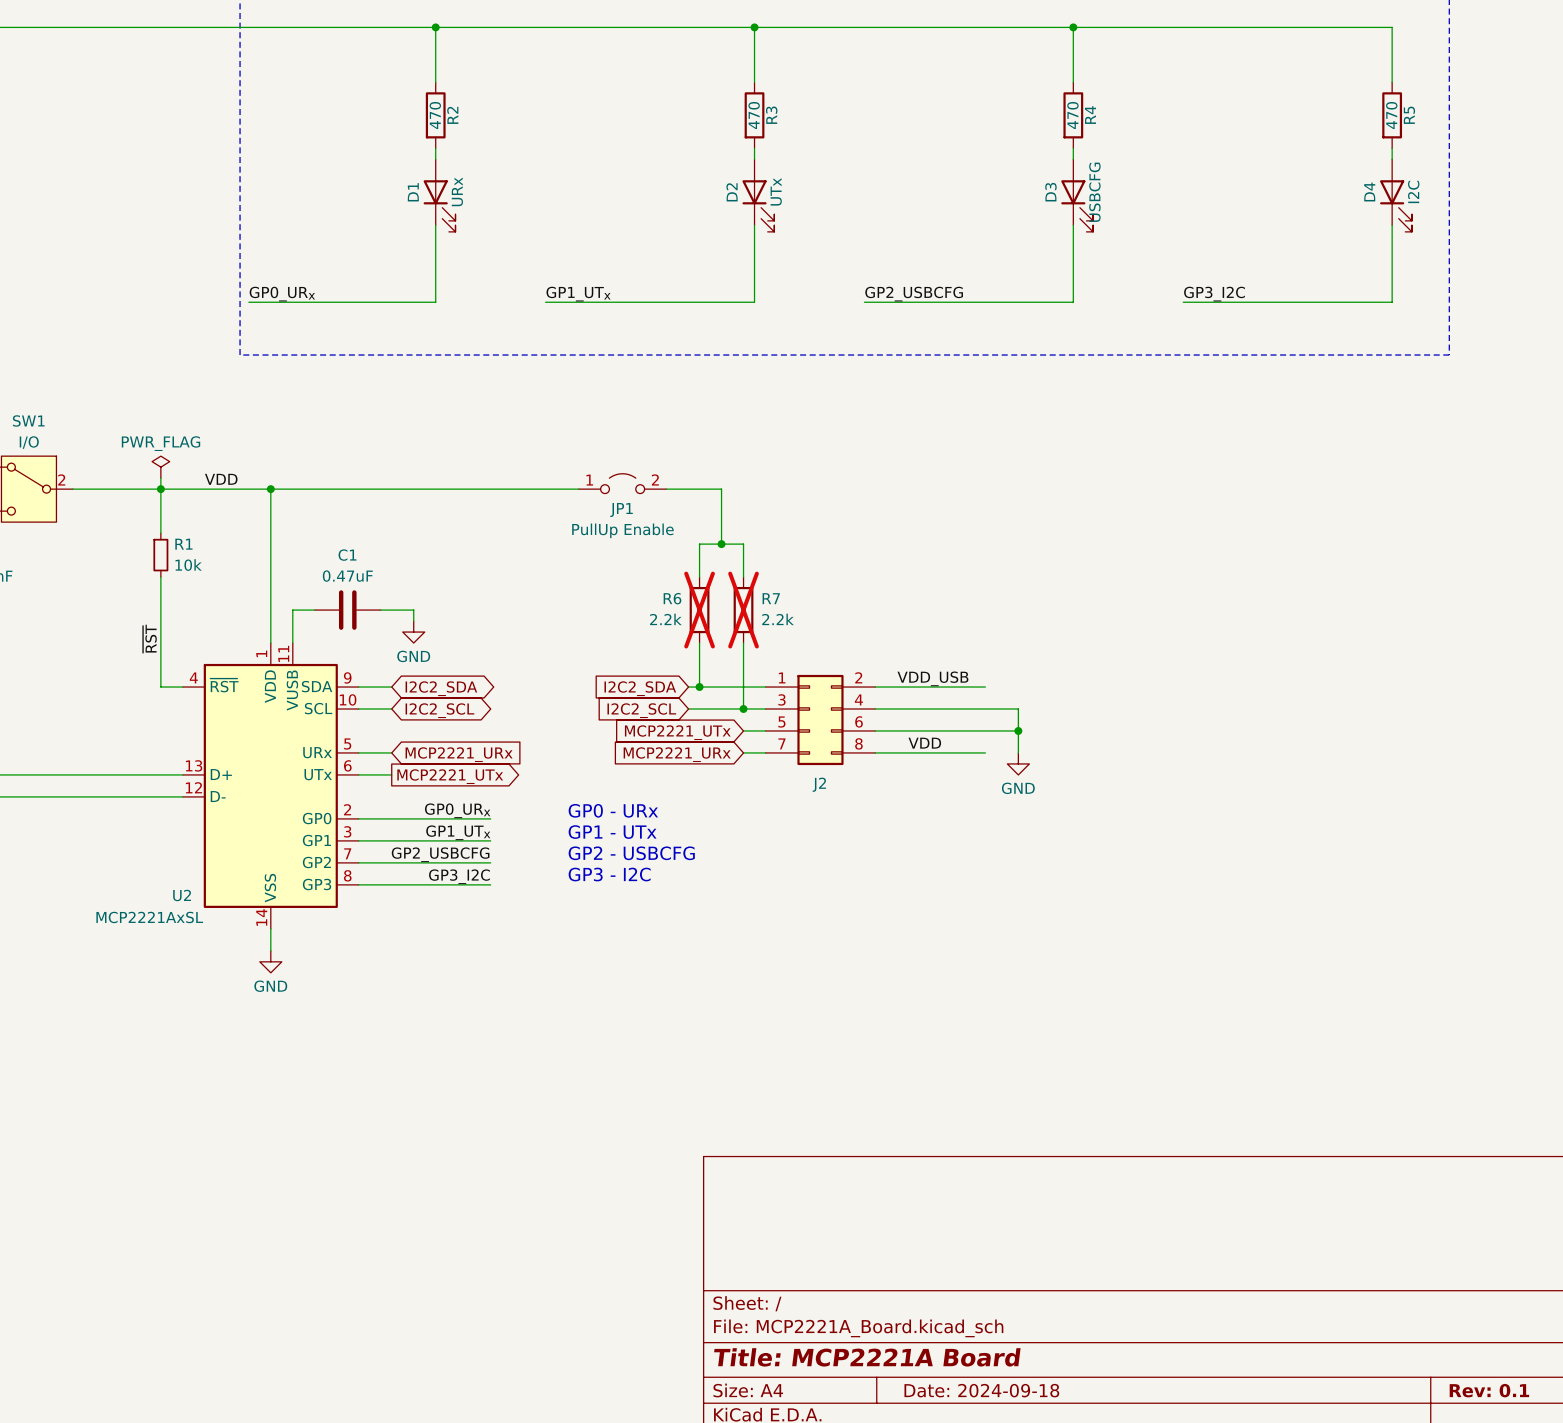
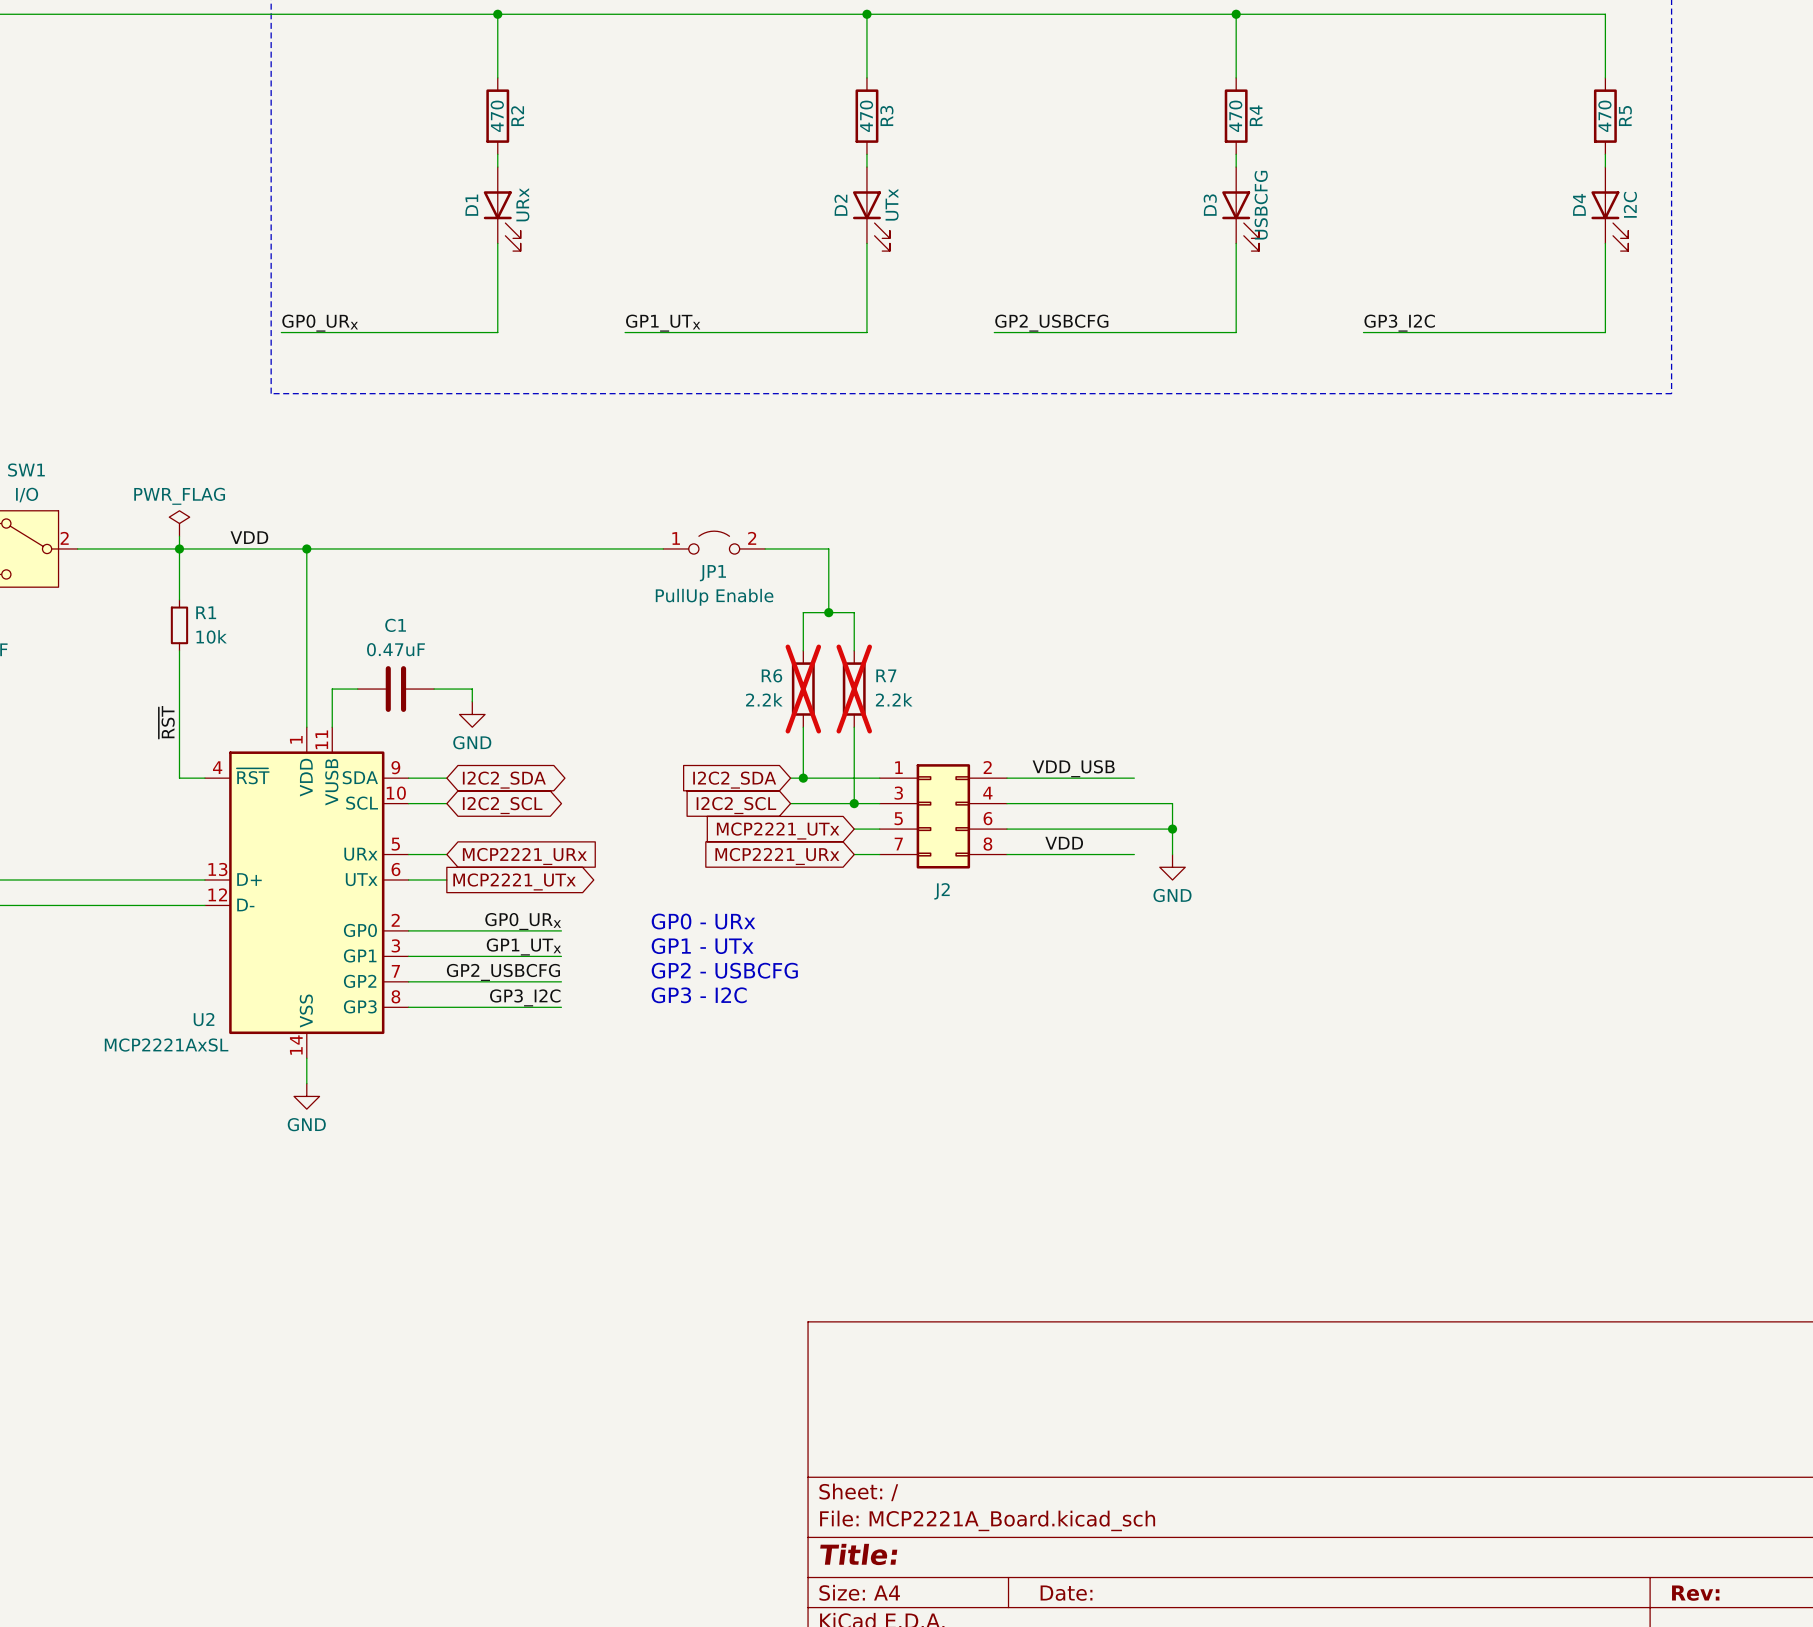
title block: Title: MCP2221A Board (867, 1357) -> Title: (858, 1554)
title block: Date: 2024-09-18 (981, 1390) -> Date: (1066, 1593)
title block: Rev: 0.1 (1489, 1390) -> Rev: (1695, 1593)

